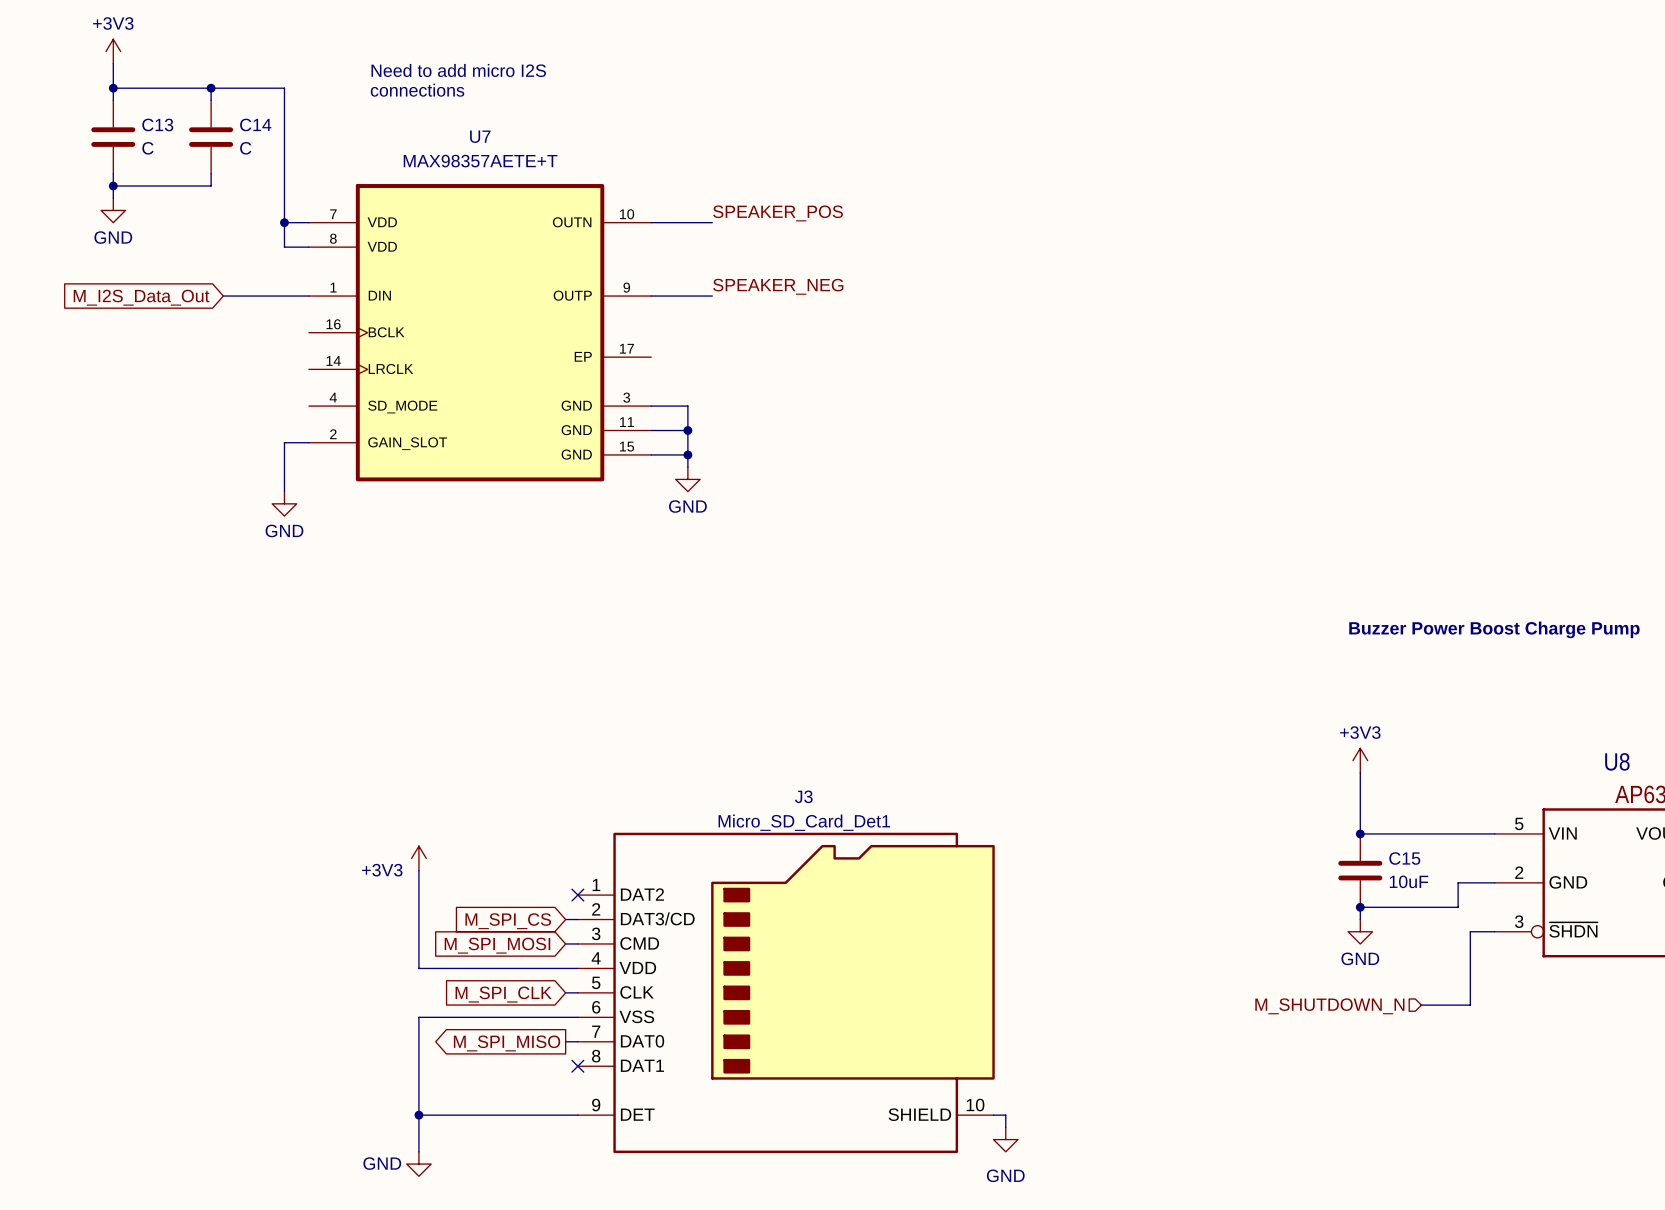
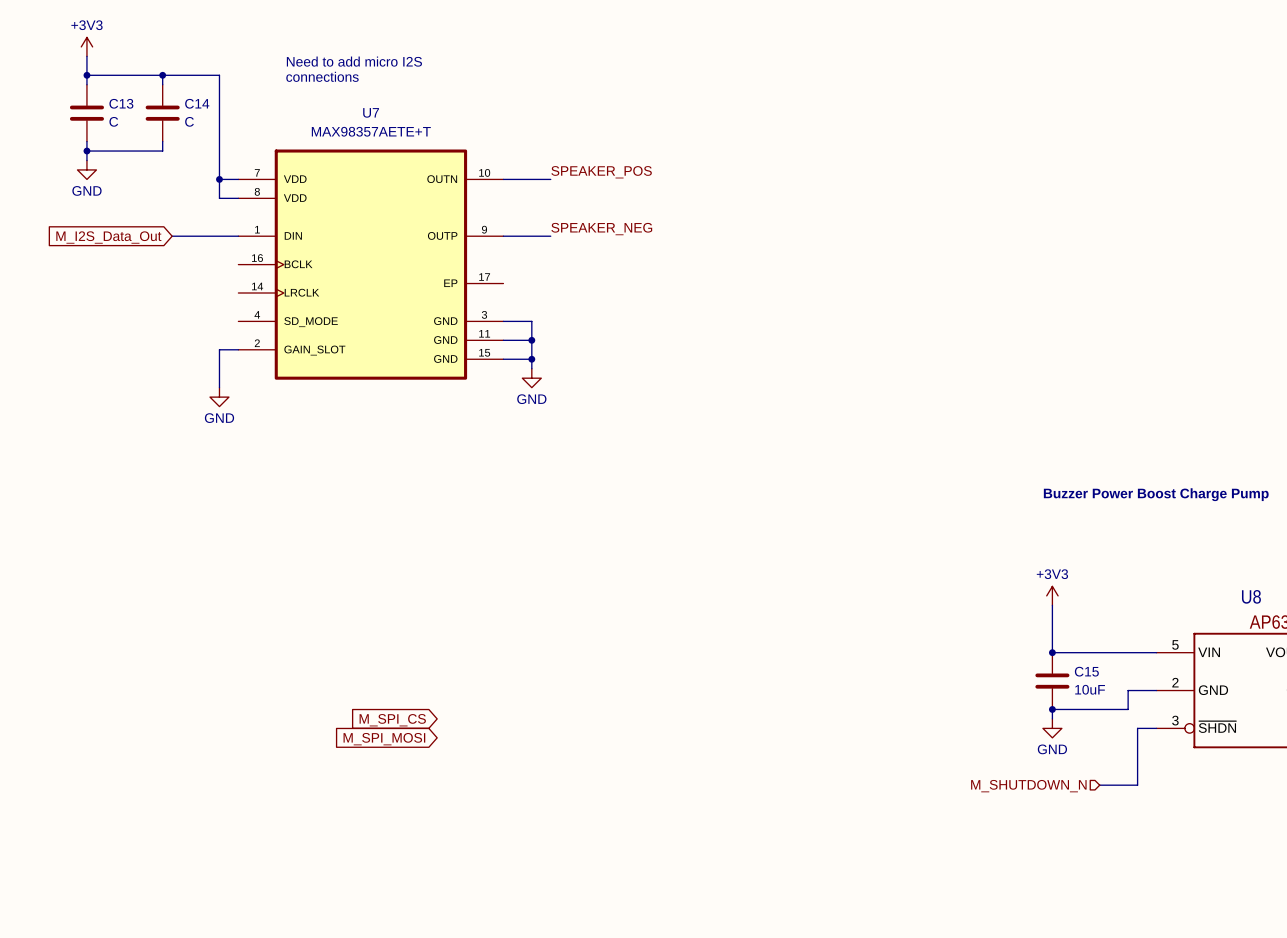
power symbol: +3V3 (418, 858) -> none
wire: (418, 870) (418, 968) (577, 968) -> none
no-connect mark: (577, 895) -> none
wire: (565, 919) (577, 919) -> none
wire: (565, 943) (577, 943) -> none
wire: (565, 992) (577, 992) -> none
J3: Micro_SD_Card_Det1 (786, 992) -> none
global label: M_SPI_CLK (503, 994) -> none
wire: (577, 1017) (418, 1017) (418, 1151) -> none
wire: (565, 1041) (577, 1041) -> none
global label: M_SPI_MISO (507, 1043) -> none
no-connect mark: (577, 1066) -> none
wire: (418, 1115) (577, 1115) -> none
junction: (418, 1115) -> none
wire: (993, 1115) (1005, 1115) (1005, 1127) -> none
power symbol: GND (1005, 1139) -> none
power symbol: GND (418, 1164) -> none

